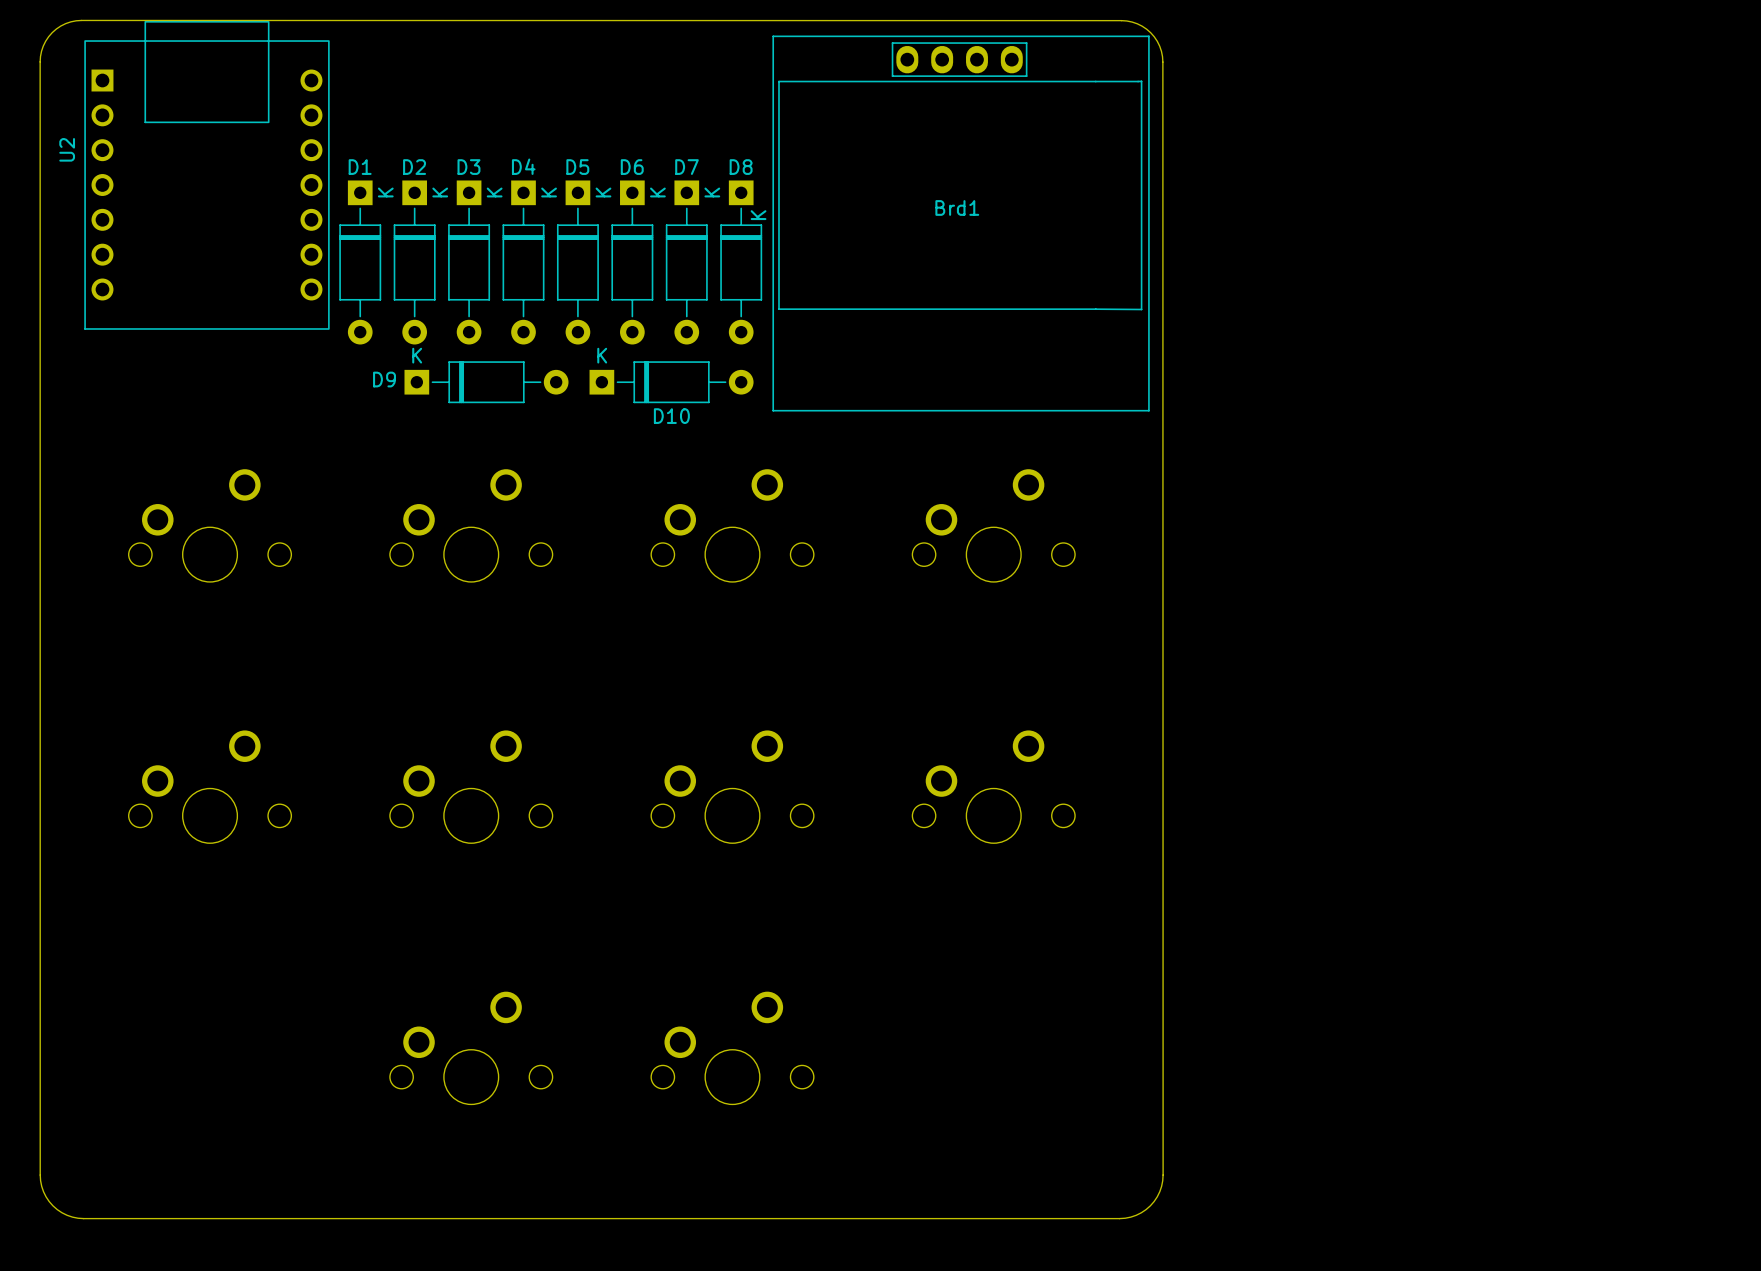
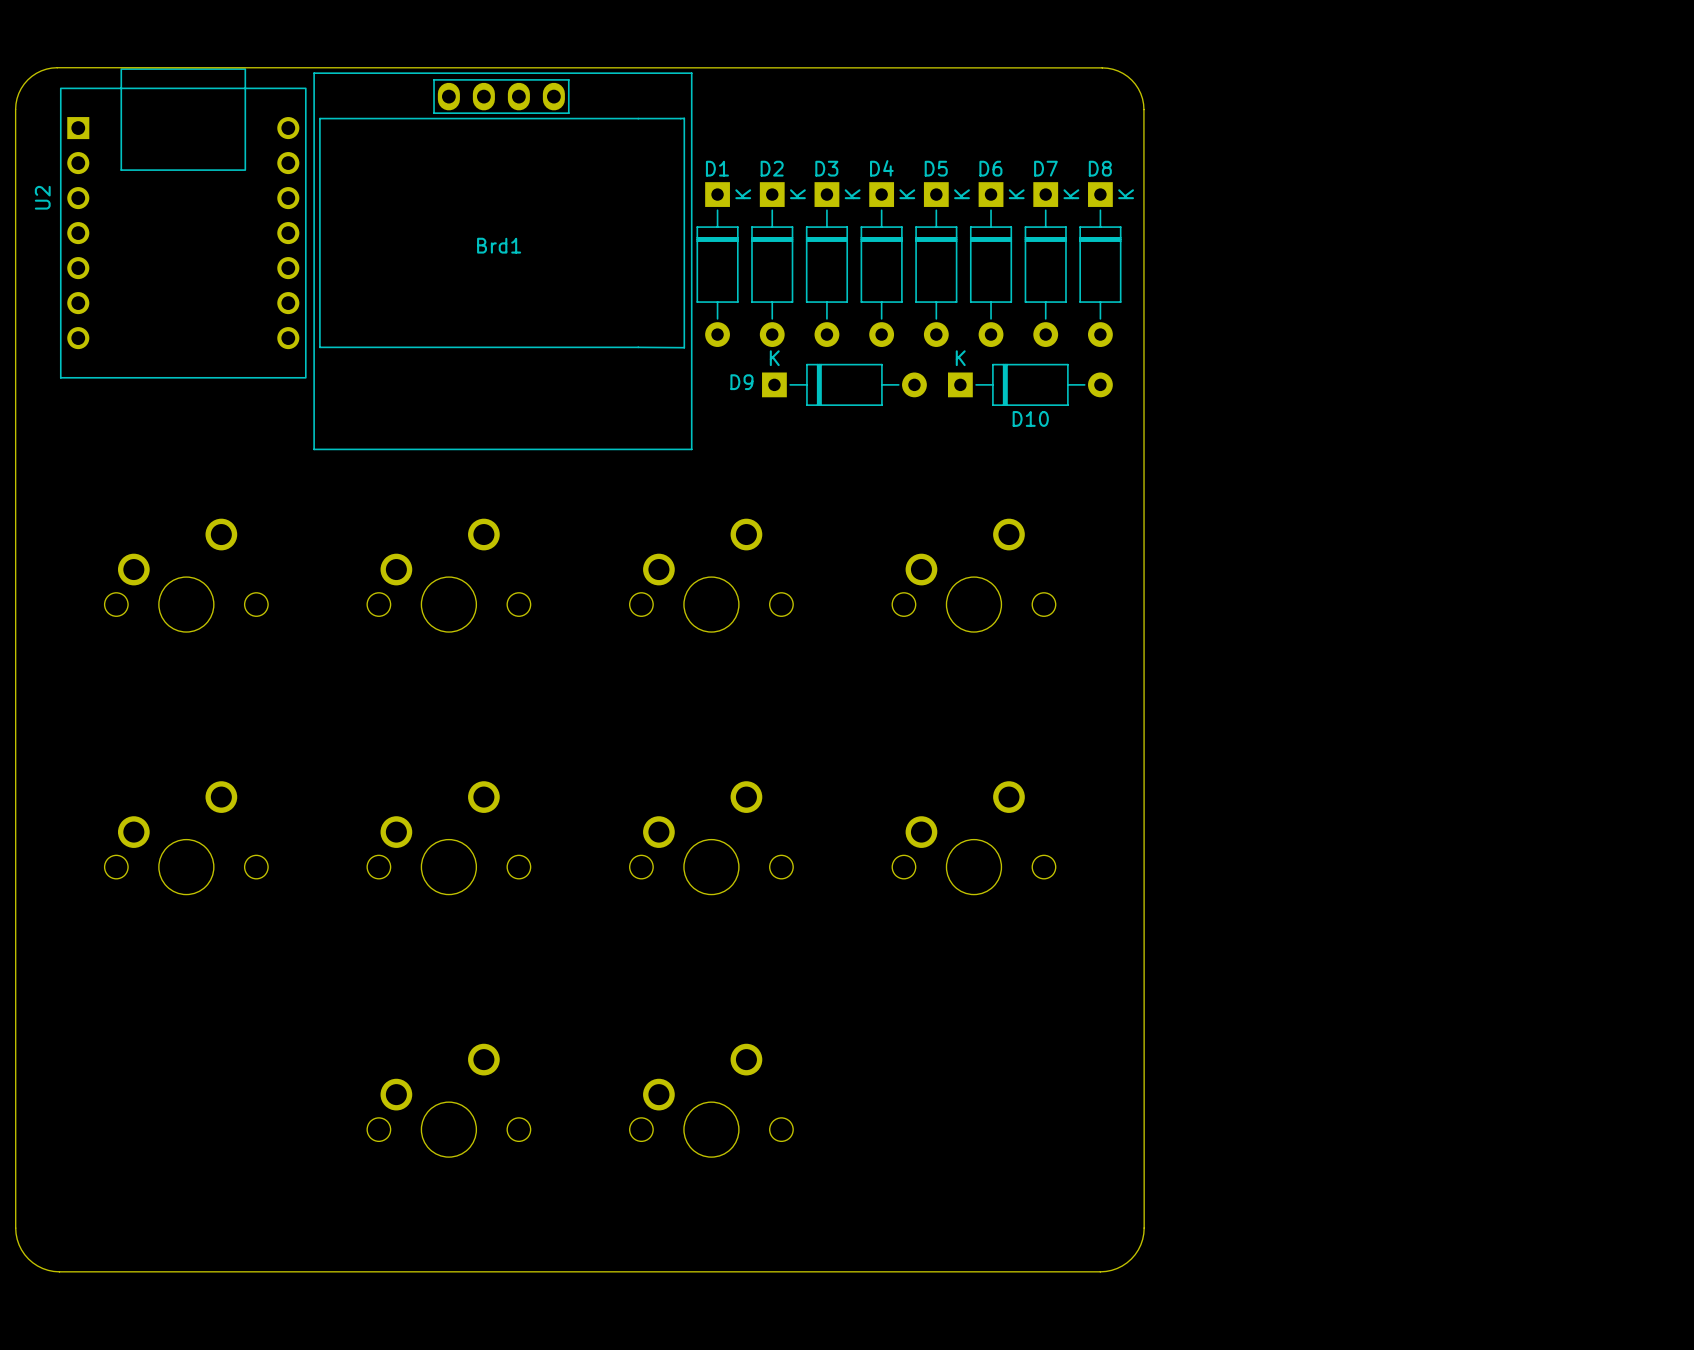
D8 text position: K (758, 215) -> K (1126, 194)
Brd1 position: (961, 223) -> (502, 261)
D1 position: (360, 262) -> (717, 264)
D2 position: (414, 262) -> (772, 264)
D3 position: (469, 262) -> (826, 264)
D4 position: (523, 262) -> (881, 264)
D5 position: (577, 262) -> (936, 264)
D6 position: (632, 262) -> (991, 264)
D7 position: (686, 262) -> (1045, 264)
D8 position: (741, 262) -> (1100, 264)
D9 position: (486, 382) -> (844, 384)
D10 position: (671, 382) -> (1030, 384)

